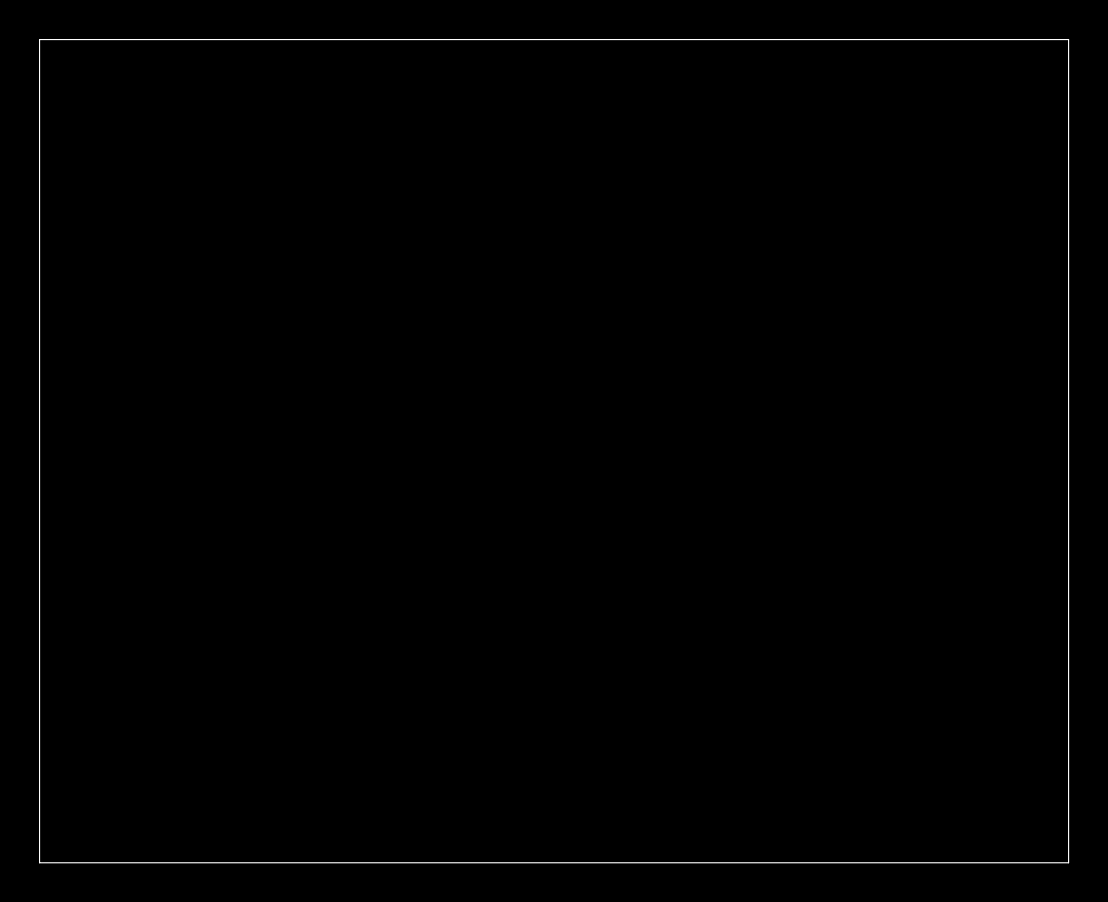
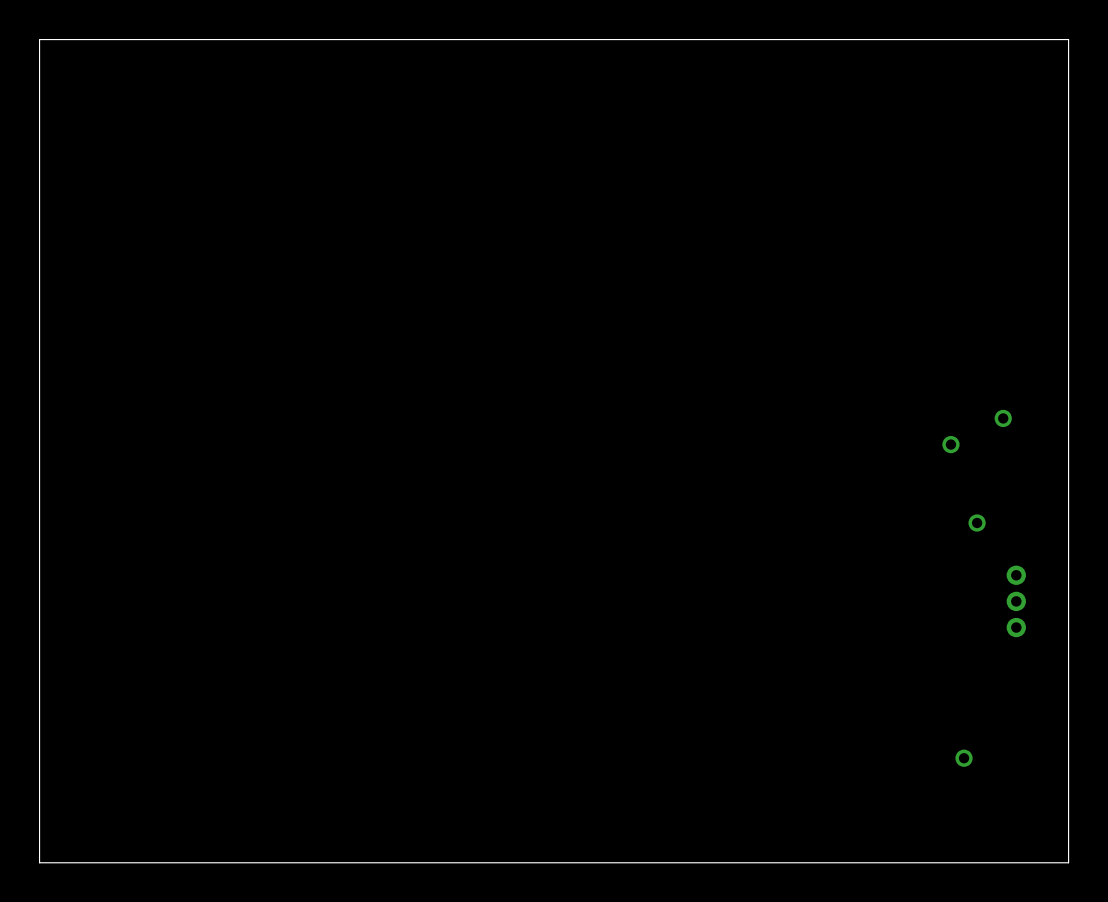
part: none -> (1003, 418)
part: none -> (950, 444)
part: none -> (977, 522)
part: none -> (1016, 601)
part: none -> (964, 758)

